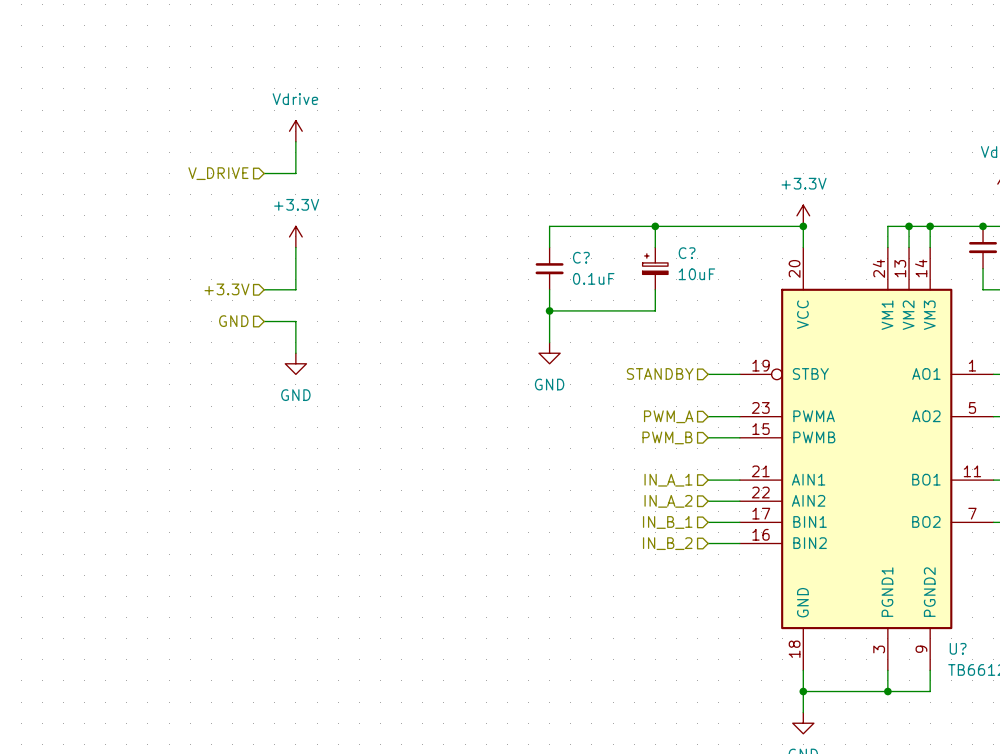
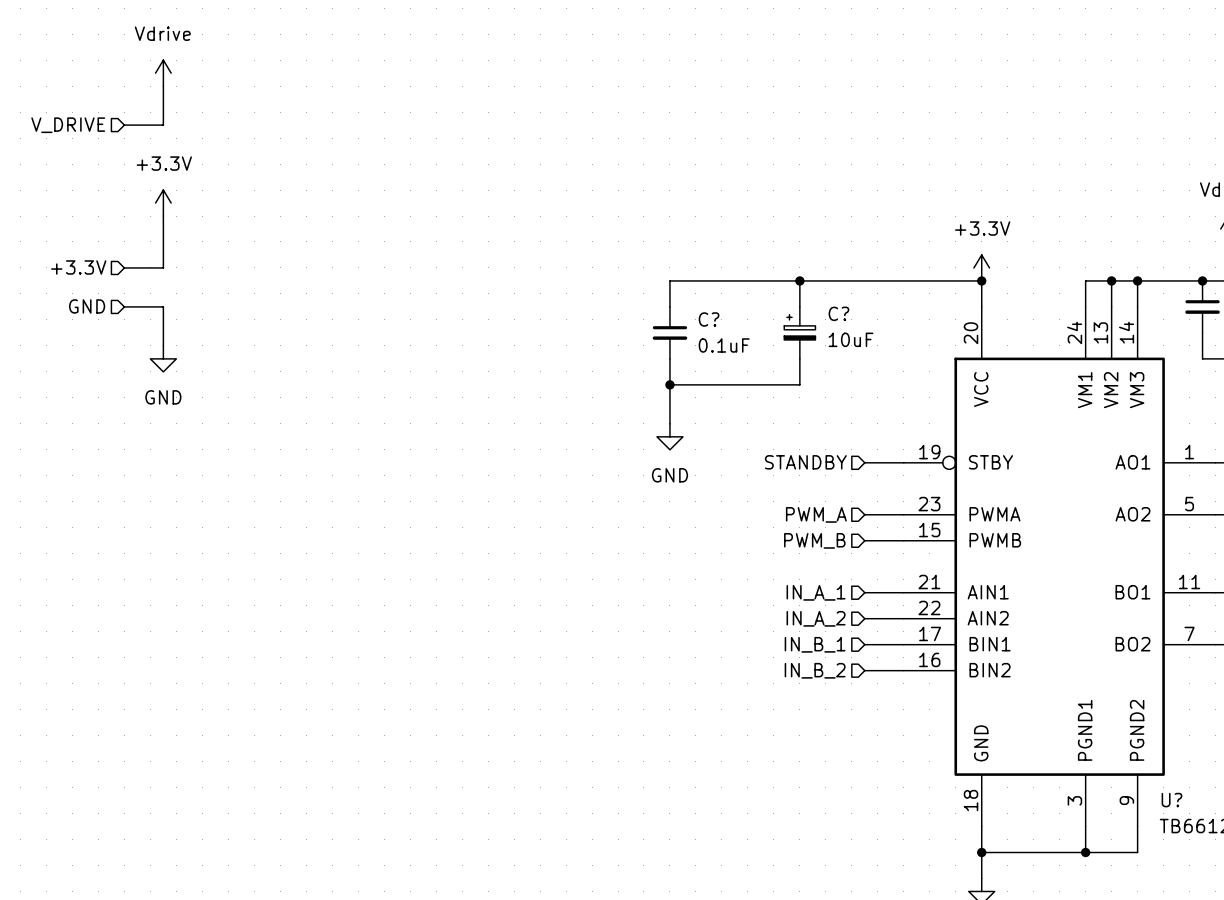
power symbol position: Vdrive (295, 131) -> Vdrive (163, 73)
wire: (295, 141) (295, 173) (264, 173) -> (163, 86) (163, 125) (124, 125)
hierarchical label position: V_DRIVE (218, 173) -> V_DRIVE (68, 125)
power symbol position: +3.3V (295, 236) -> +3.3V (163, 203)
wire: (295, 247) (295, 289) (264, 289) -> (163, 216) (163, 267) (124, 267)
hierarchical label position: +3.3V (227, 289) -> +3.3V (78, 267)
hierarchical label position: GND (233, 321) -> GND (87, 306)
wire: (264, 321) (295, 321) (295, 353) -> (124, 306) (163, 306) (163, 345)
power symbol position: GND (295, 363) -> GND (163, 358)

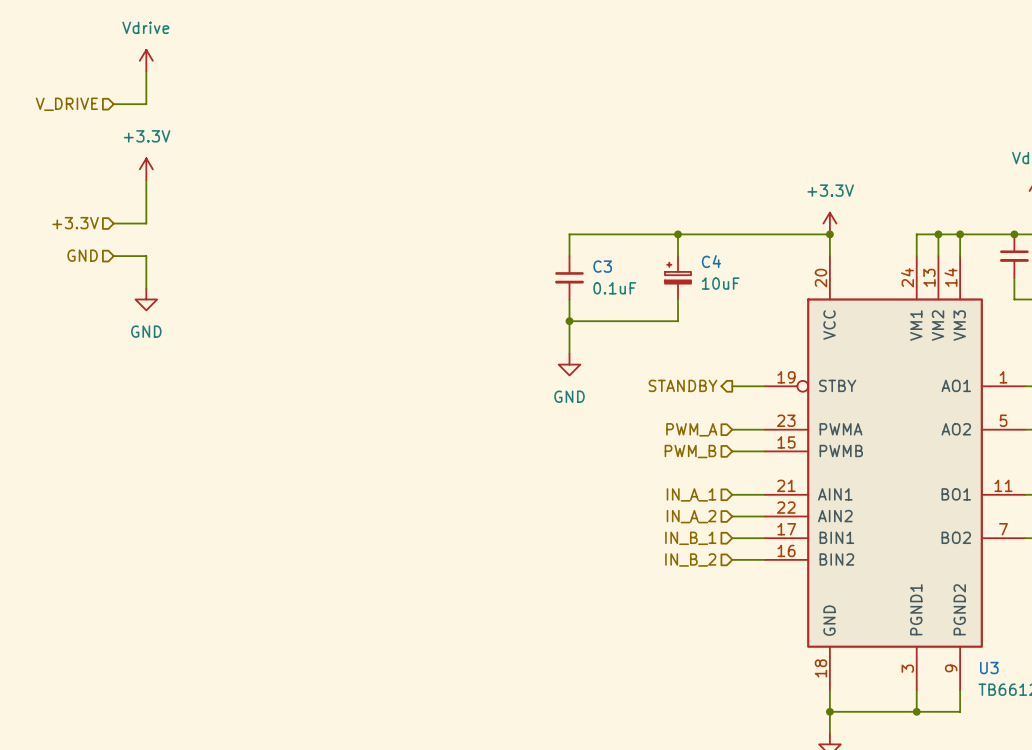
C? name: C? (838, 313) -> C4 (711, 261)
C? name: C? (709, 319) -> C3 (602, 266)
hierarchical label shape: input (805, 462) -> output (683, 385)
U? name: U? (1171, 800) -> U3 (989, 668)

